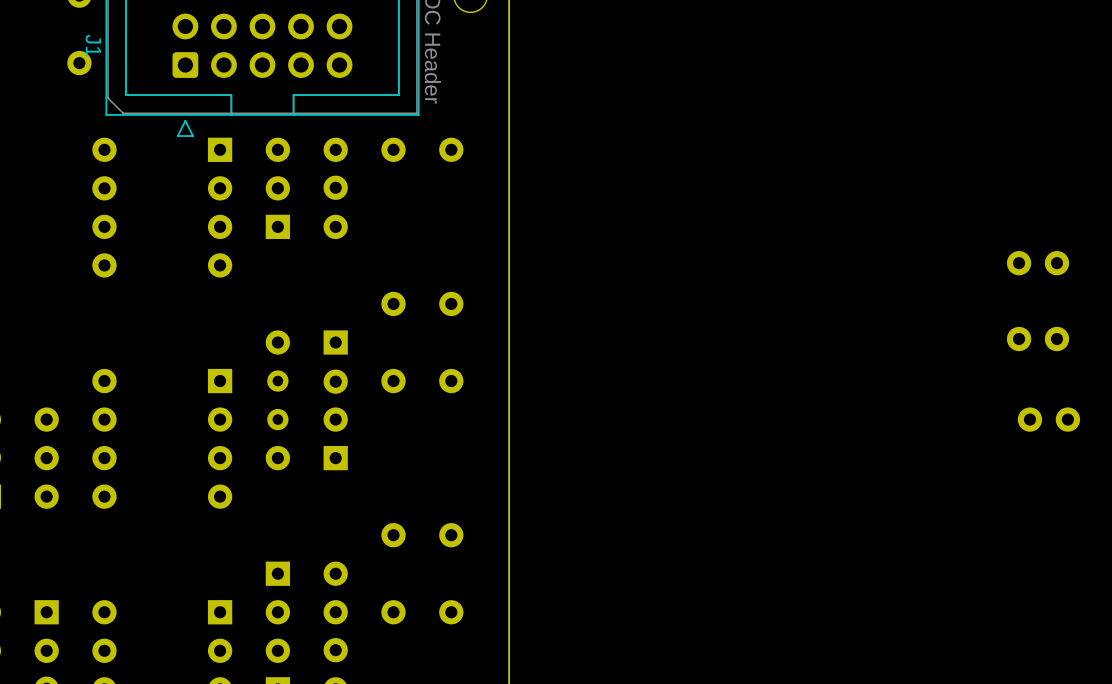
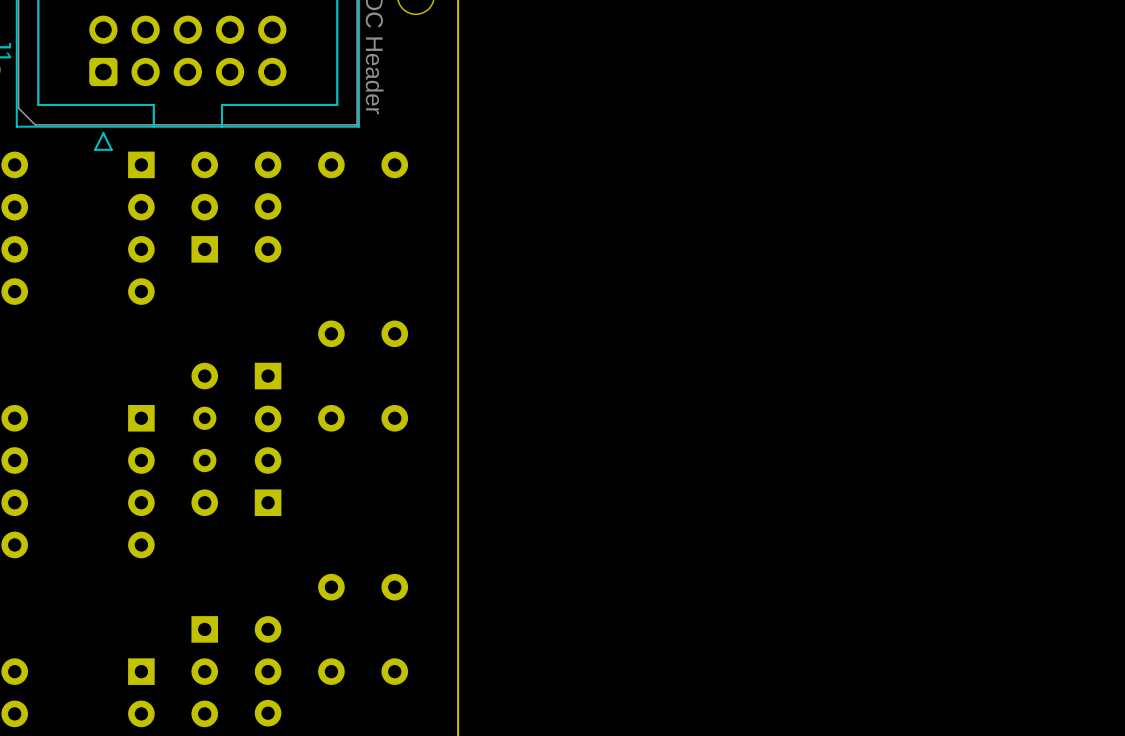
part: (1038, 263) -> none
part: (1038, 339) -> none
part: (1048, 419) -> none

